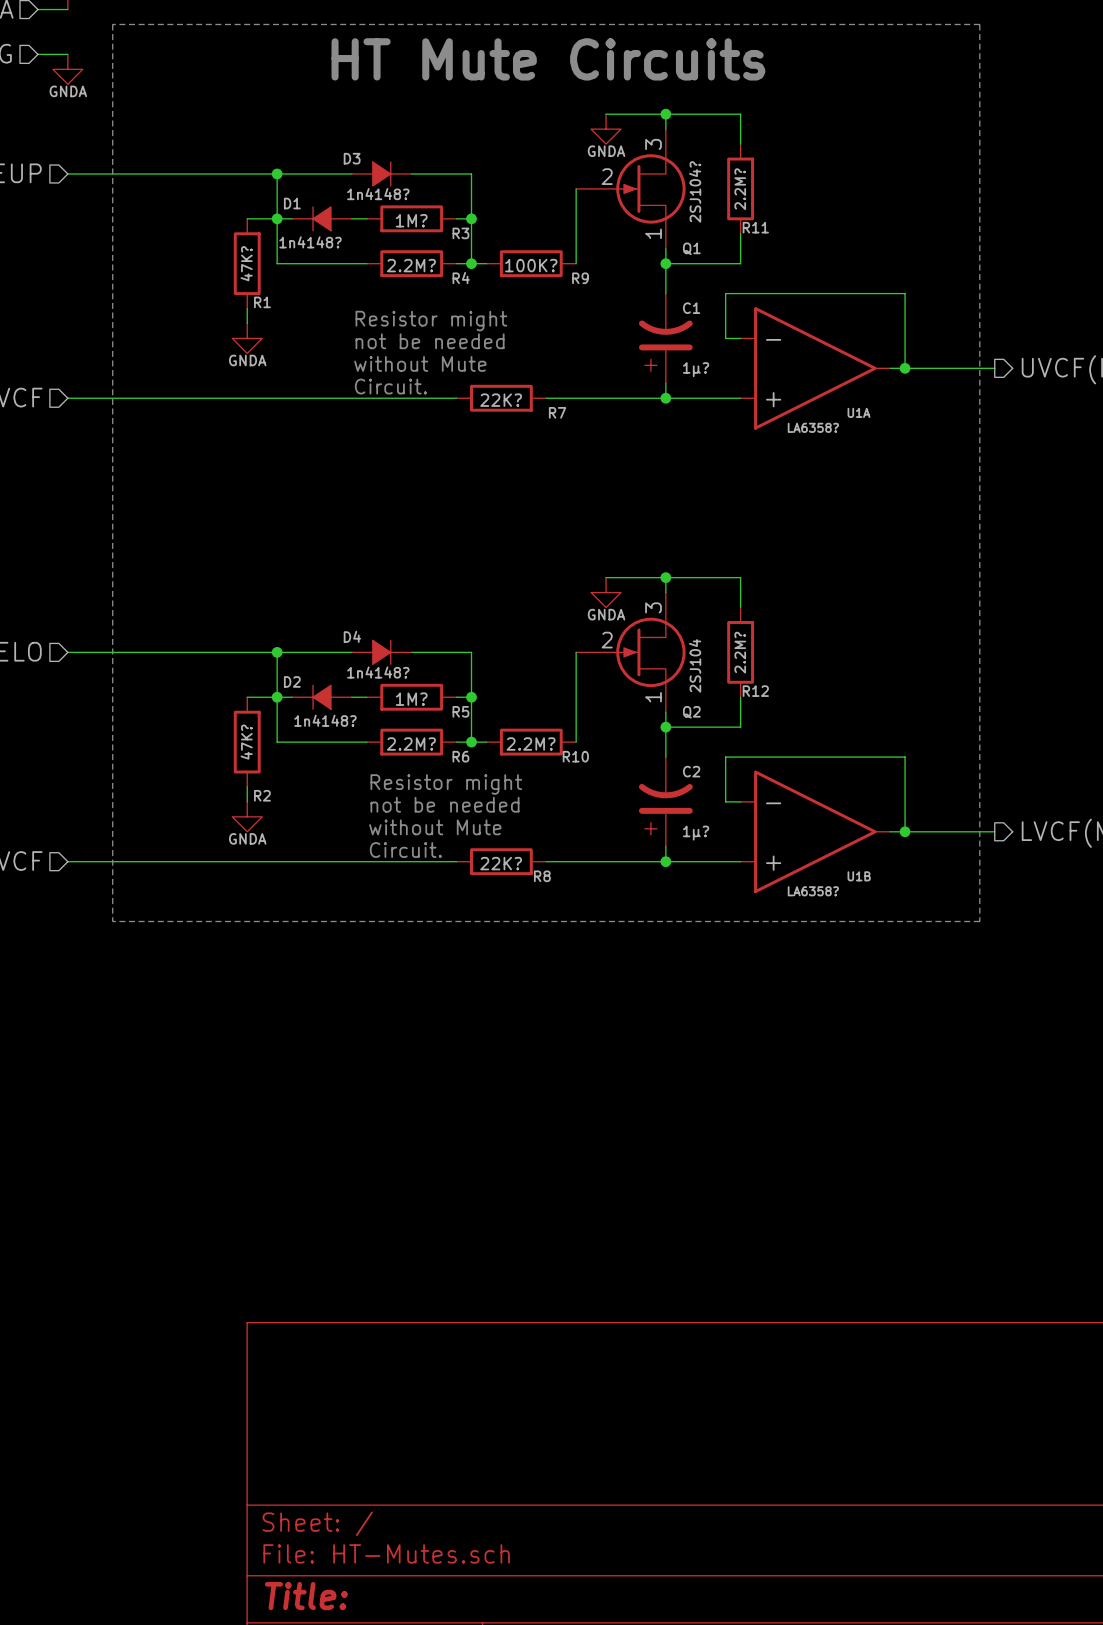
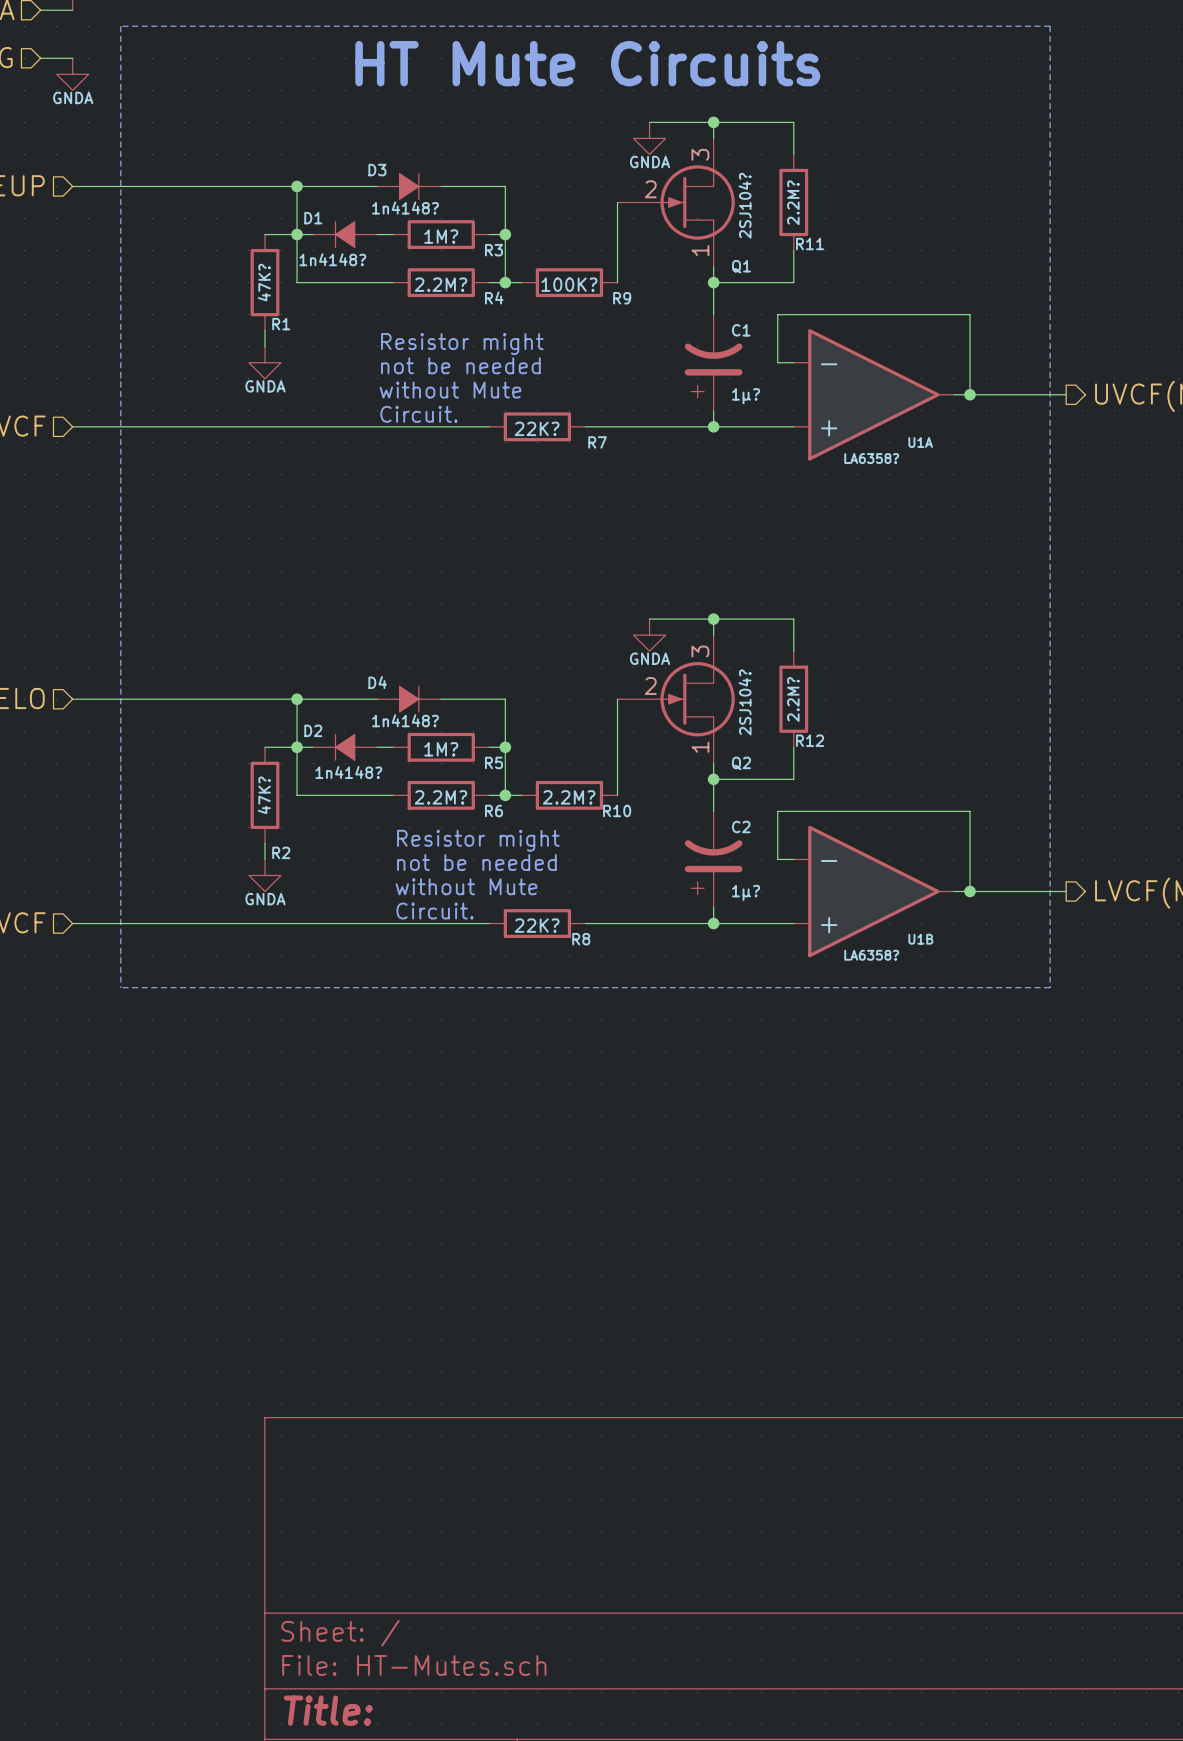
Q2 value: 2SJ104 (695, 665) -> 2SJ104? (745, 702)

